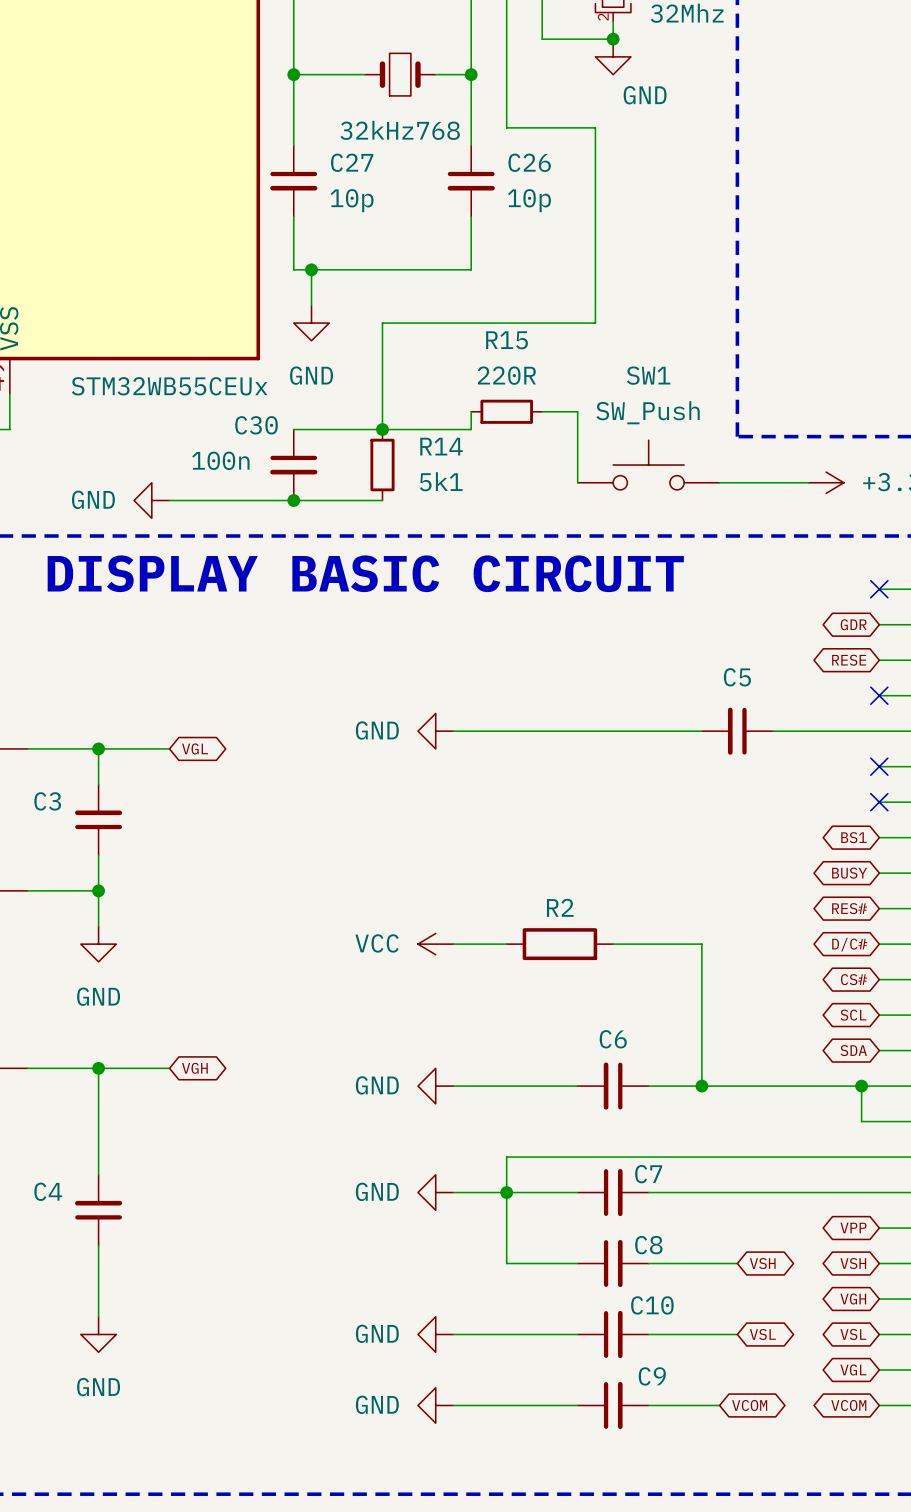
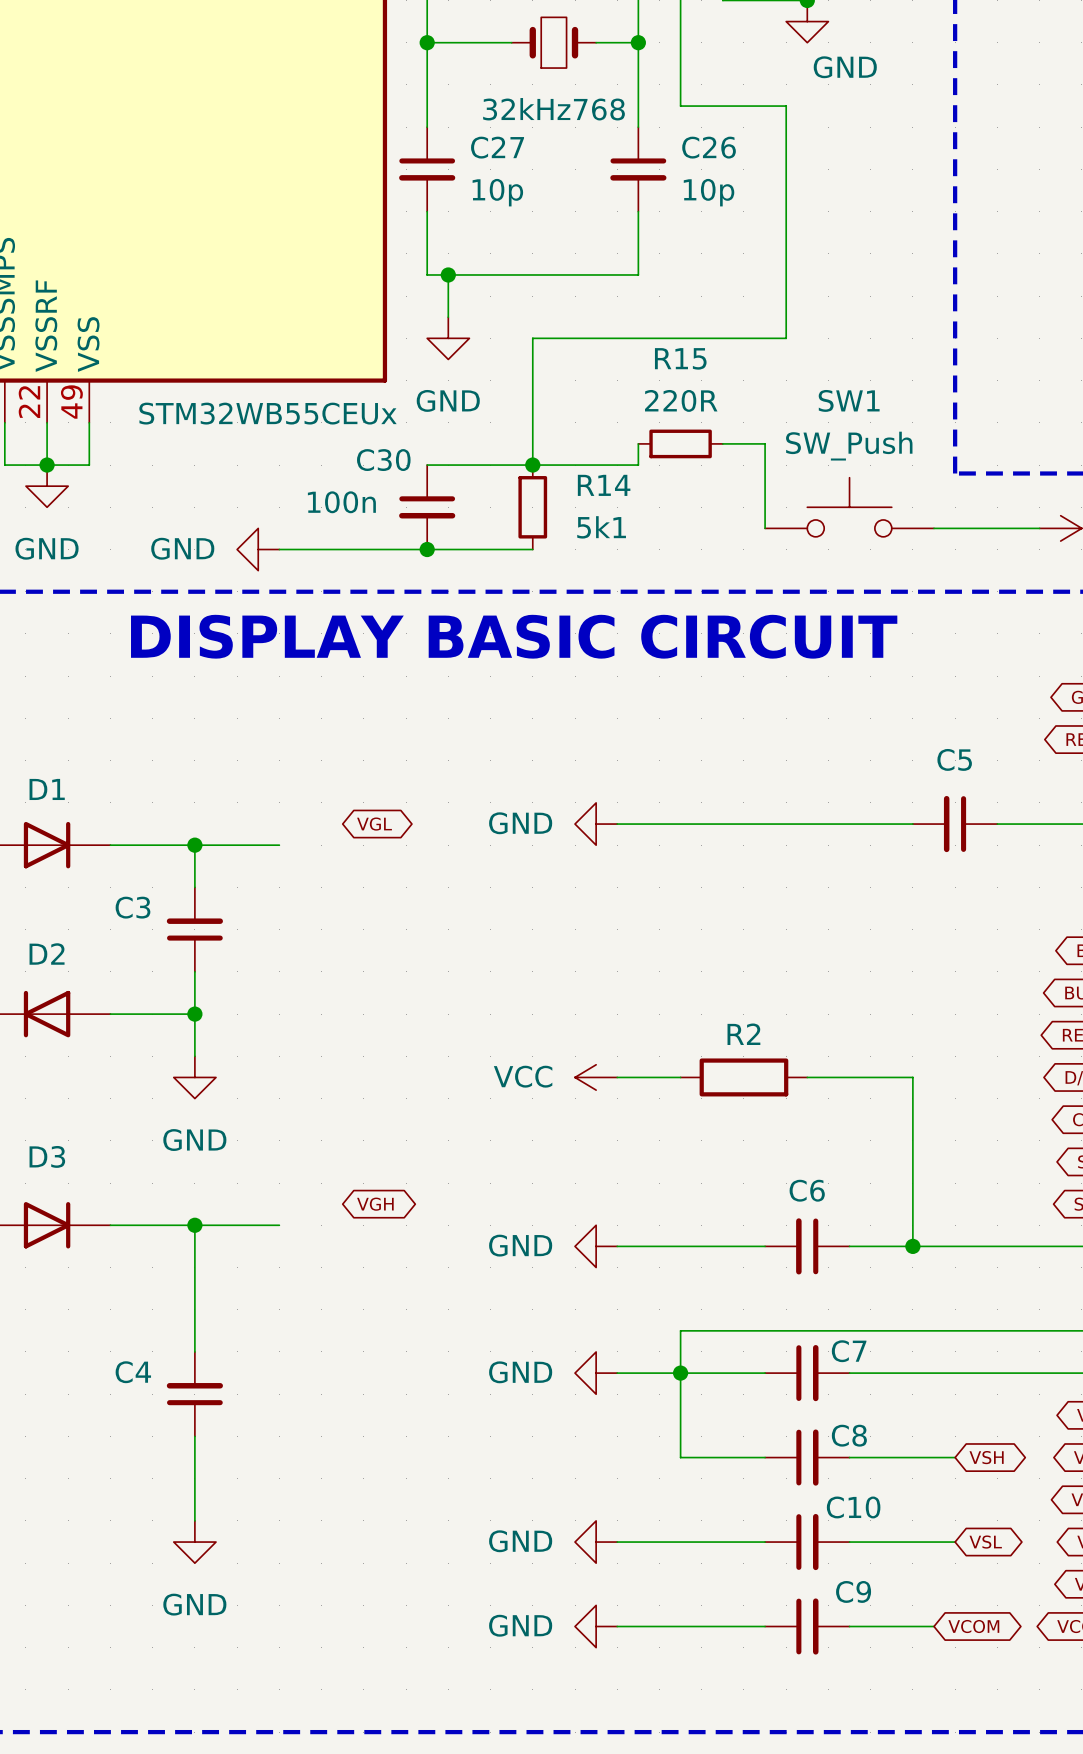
global label position: VGL (195, 748) -> VGL (374, 824)
global label position: VGH (194, 1068) -> VGH (375, 1204)

